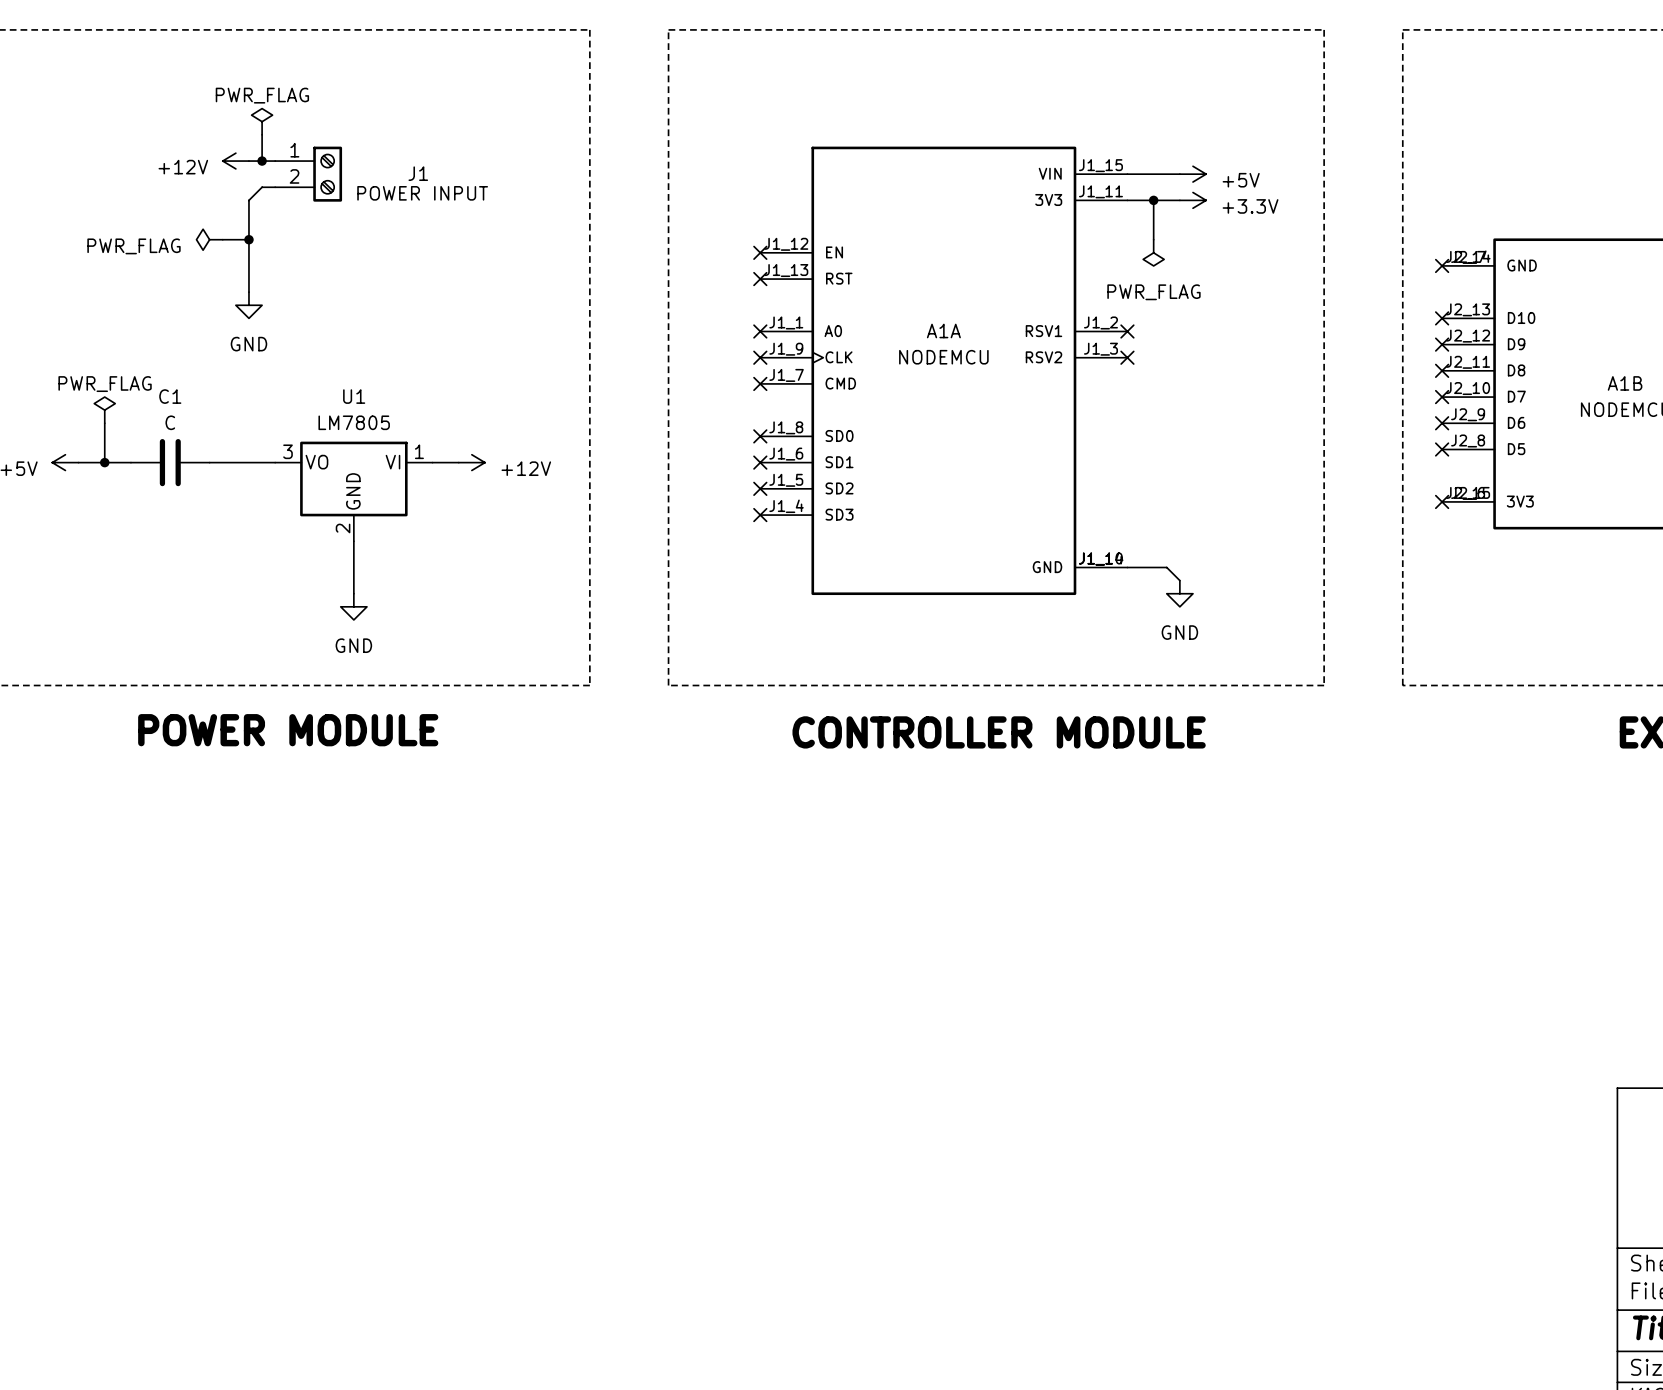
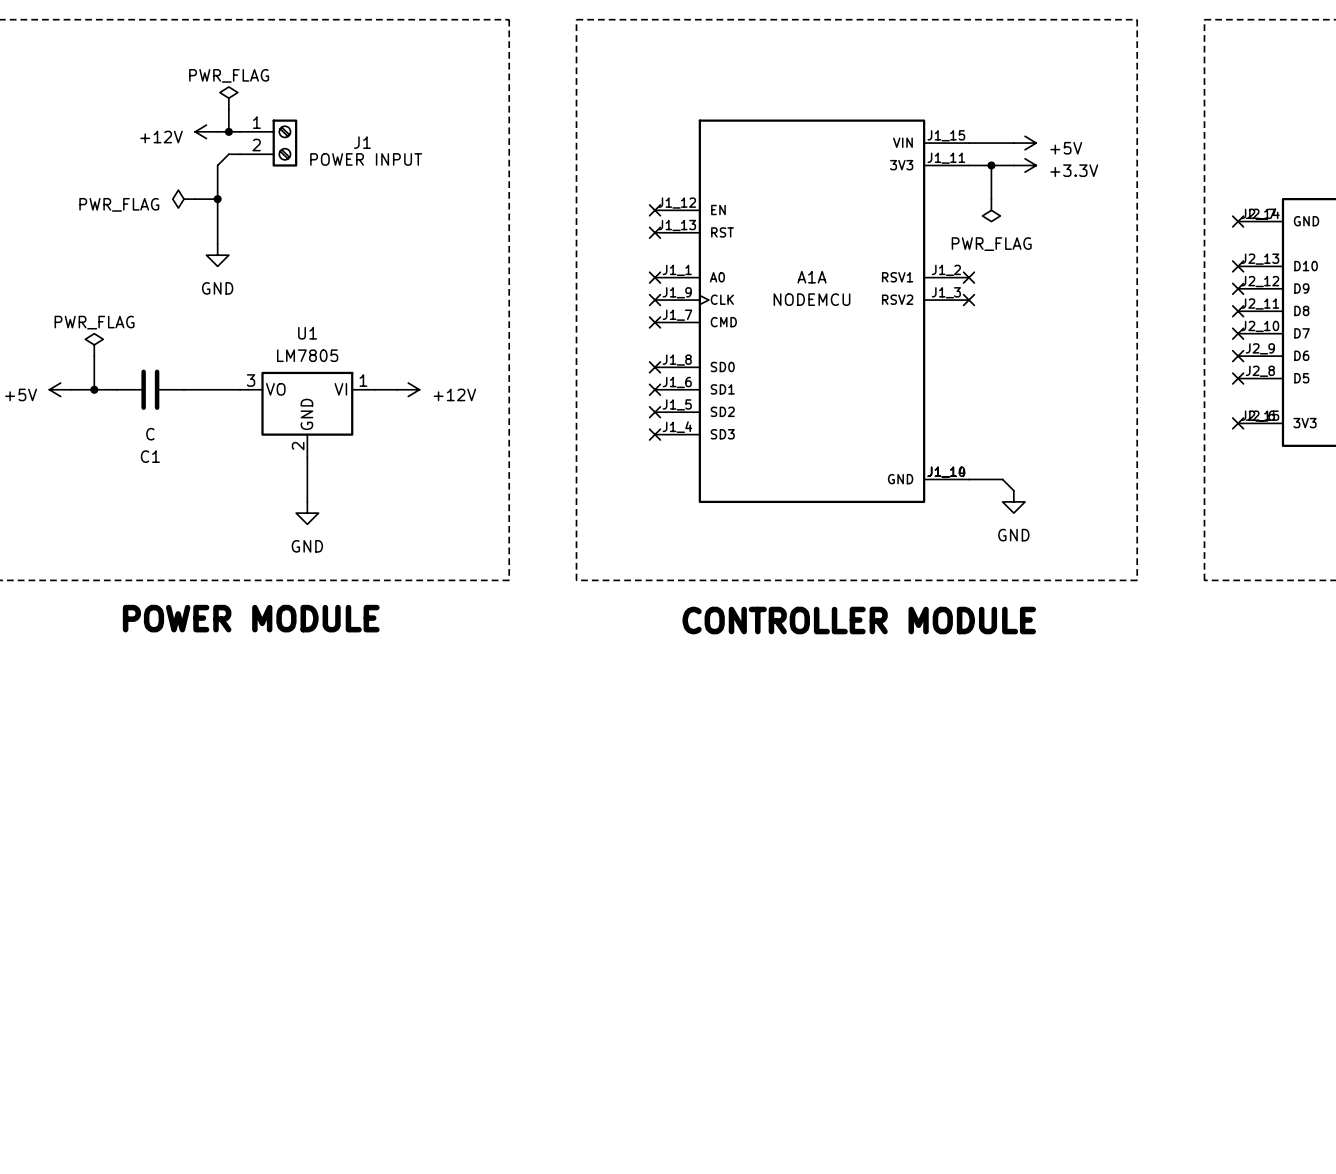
C1 name position: C1 (170, 396) -> C1 (150, 456)
C1 value position: C (170, 422) -> C (150, 434)

